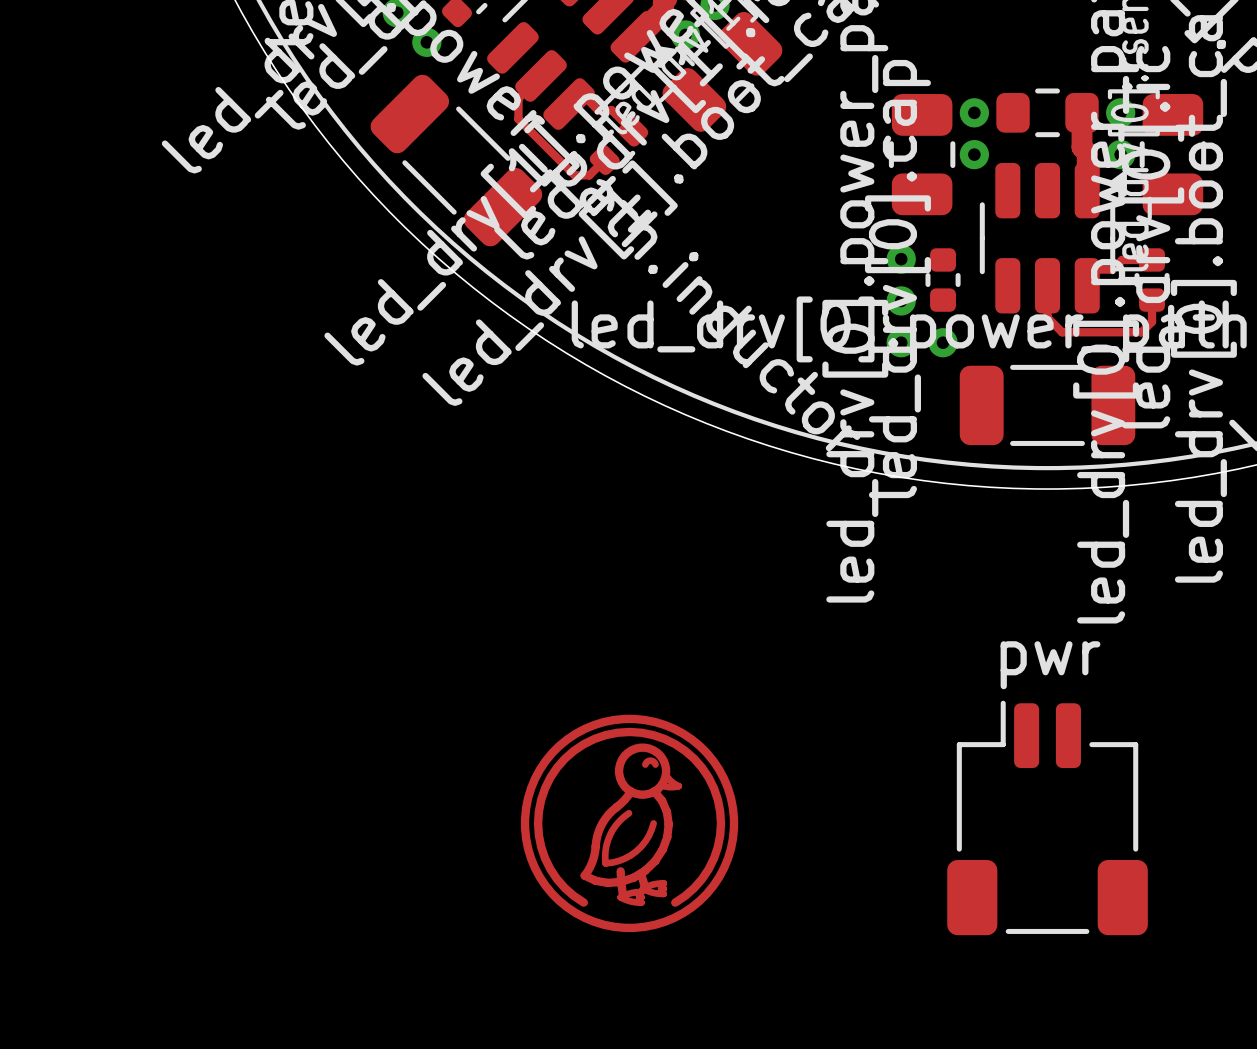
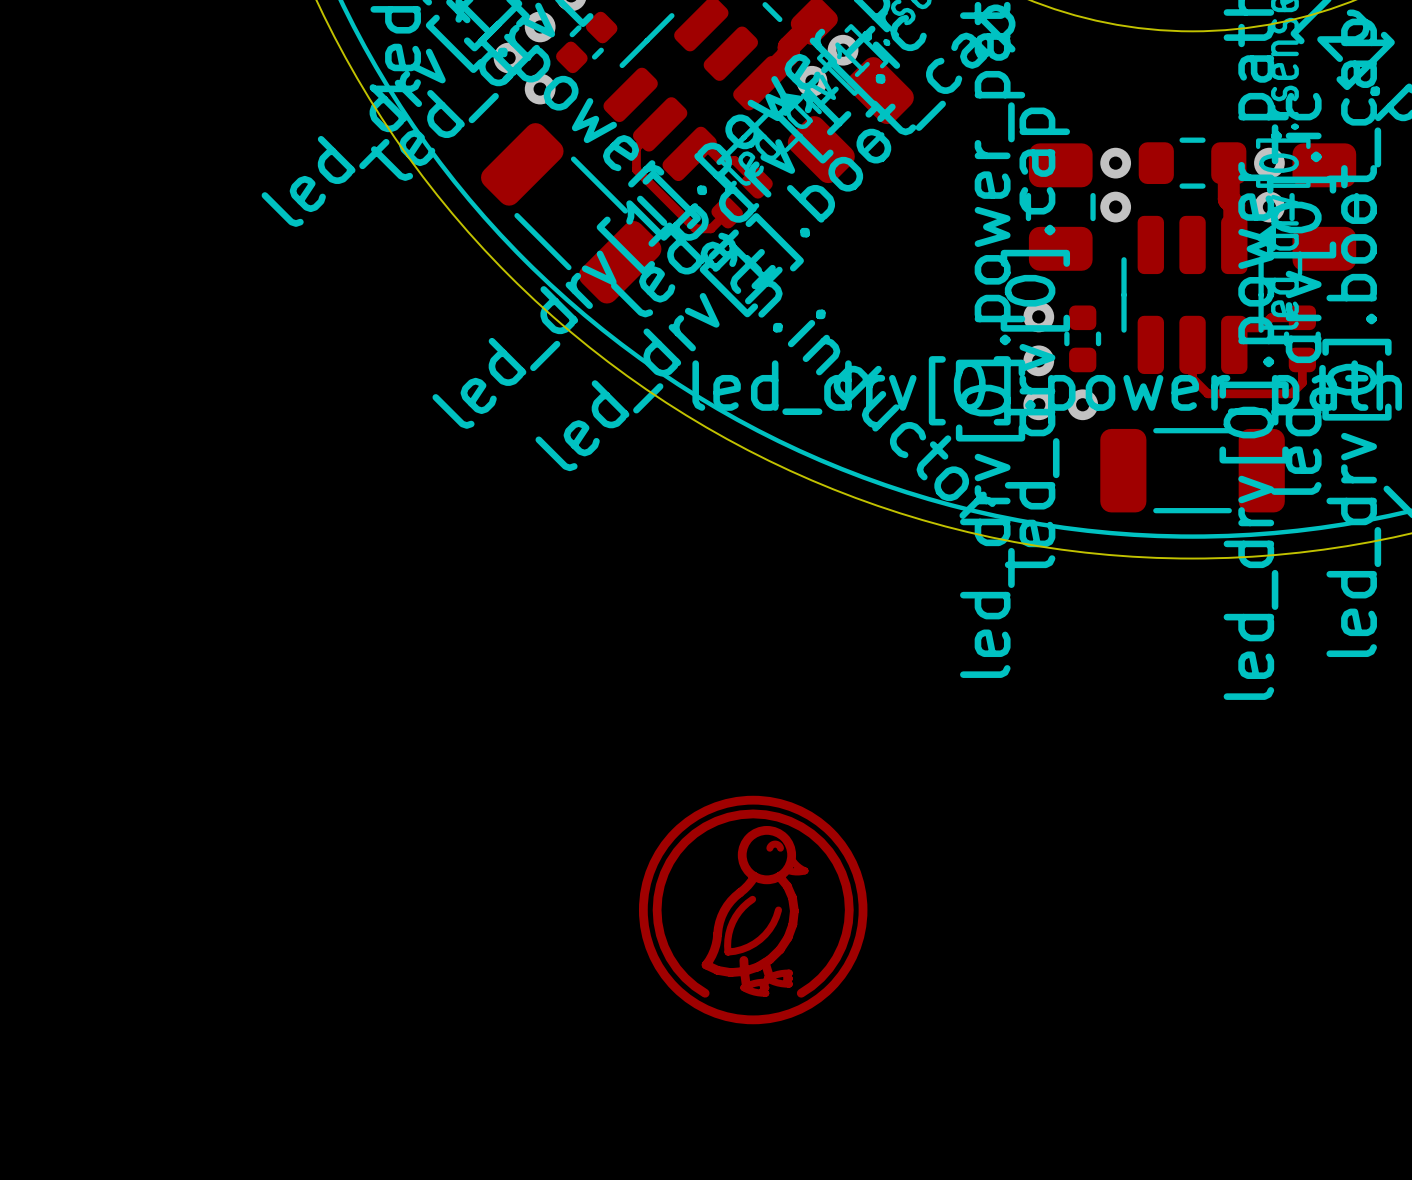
pwr: (1047, 817) -> none

